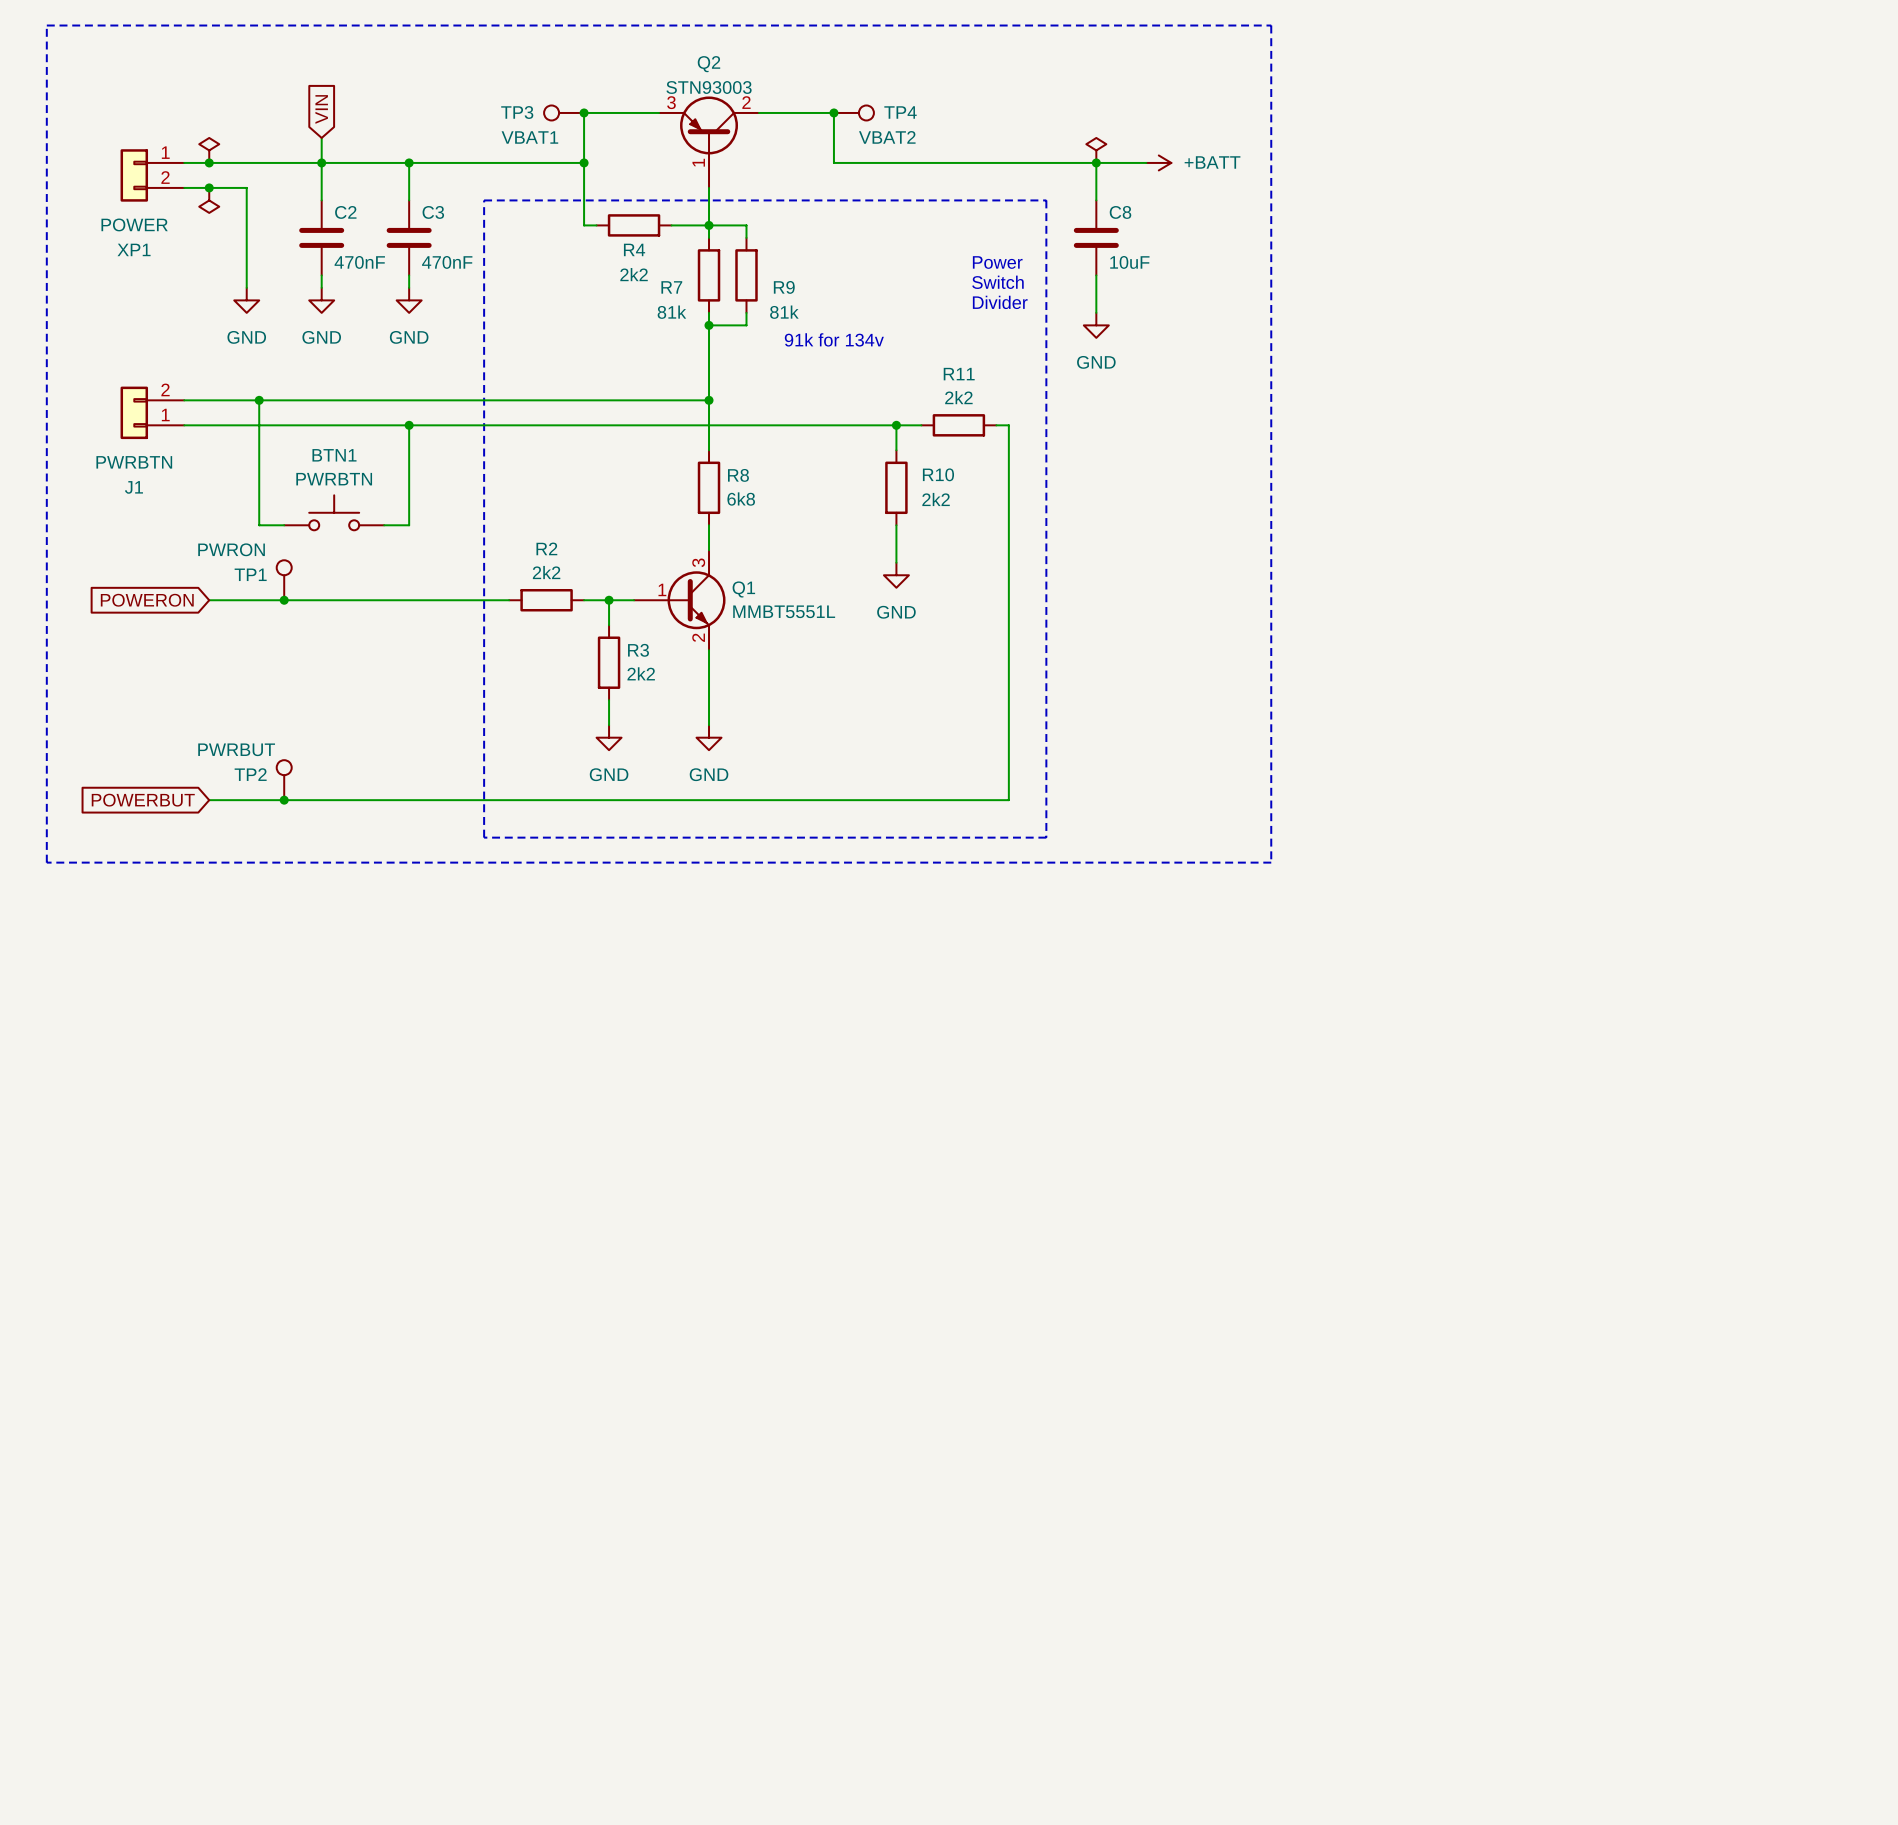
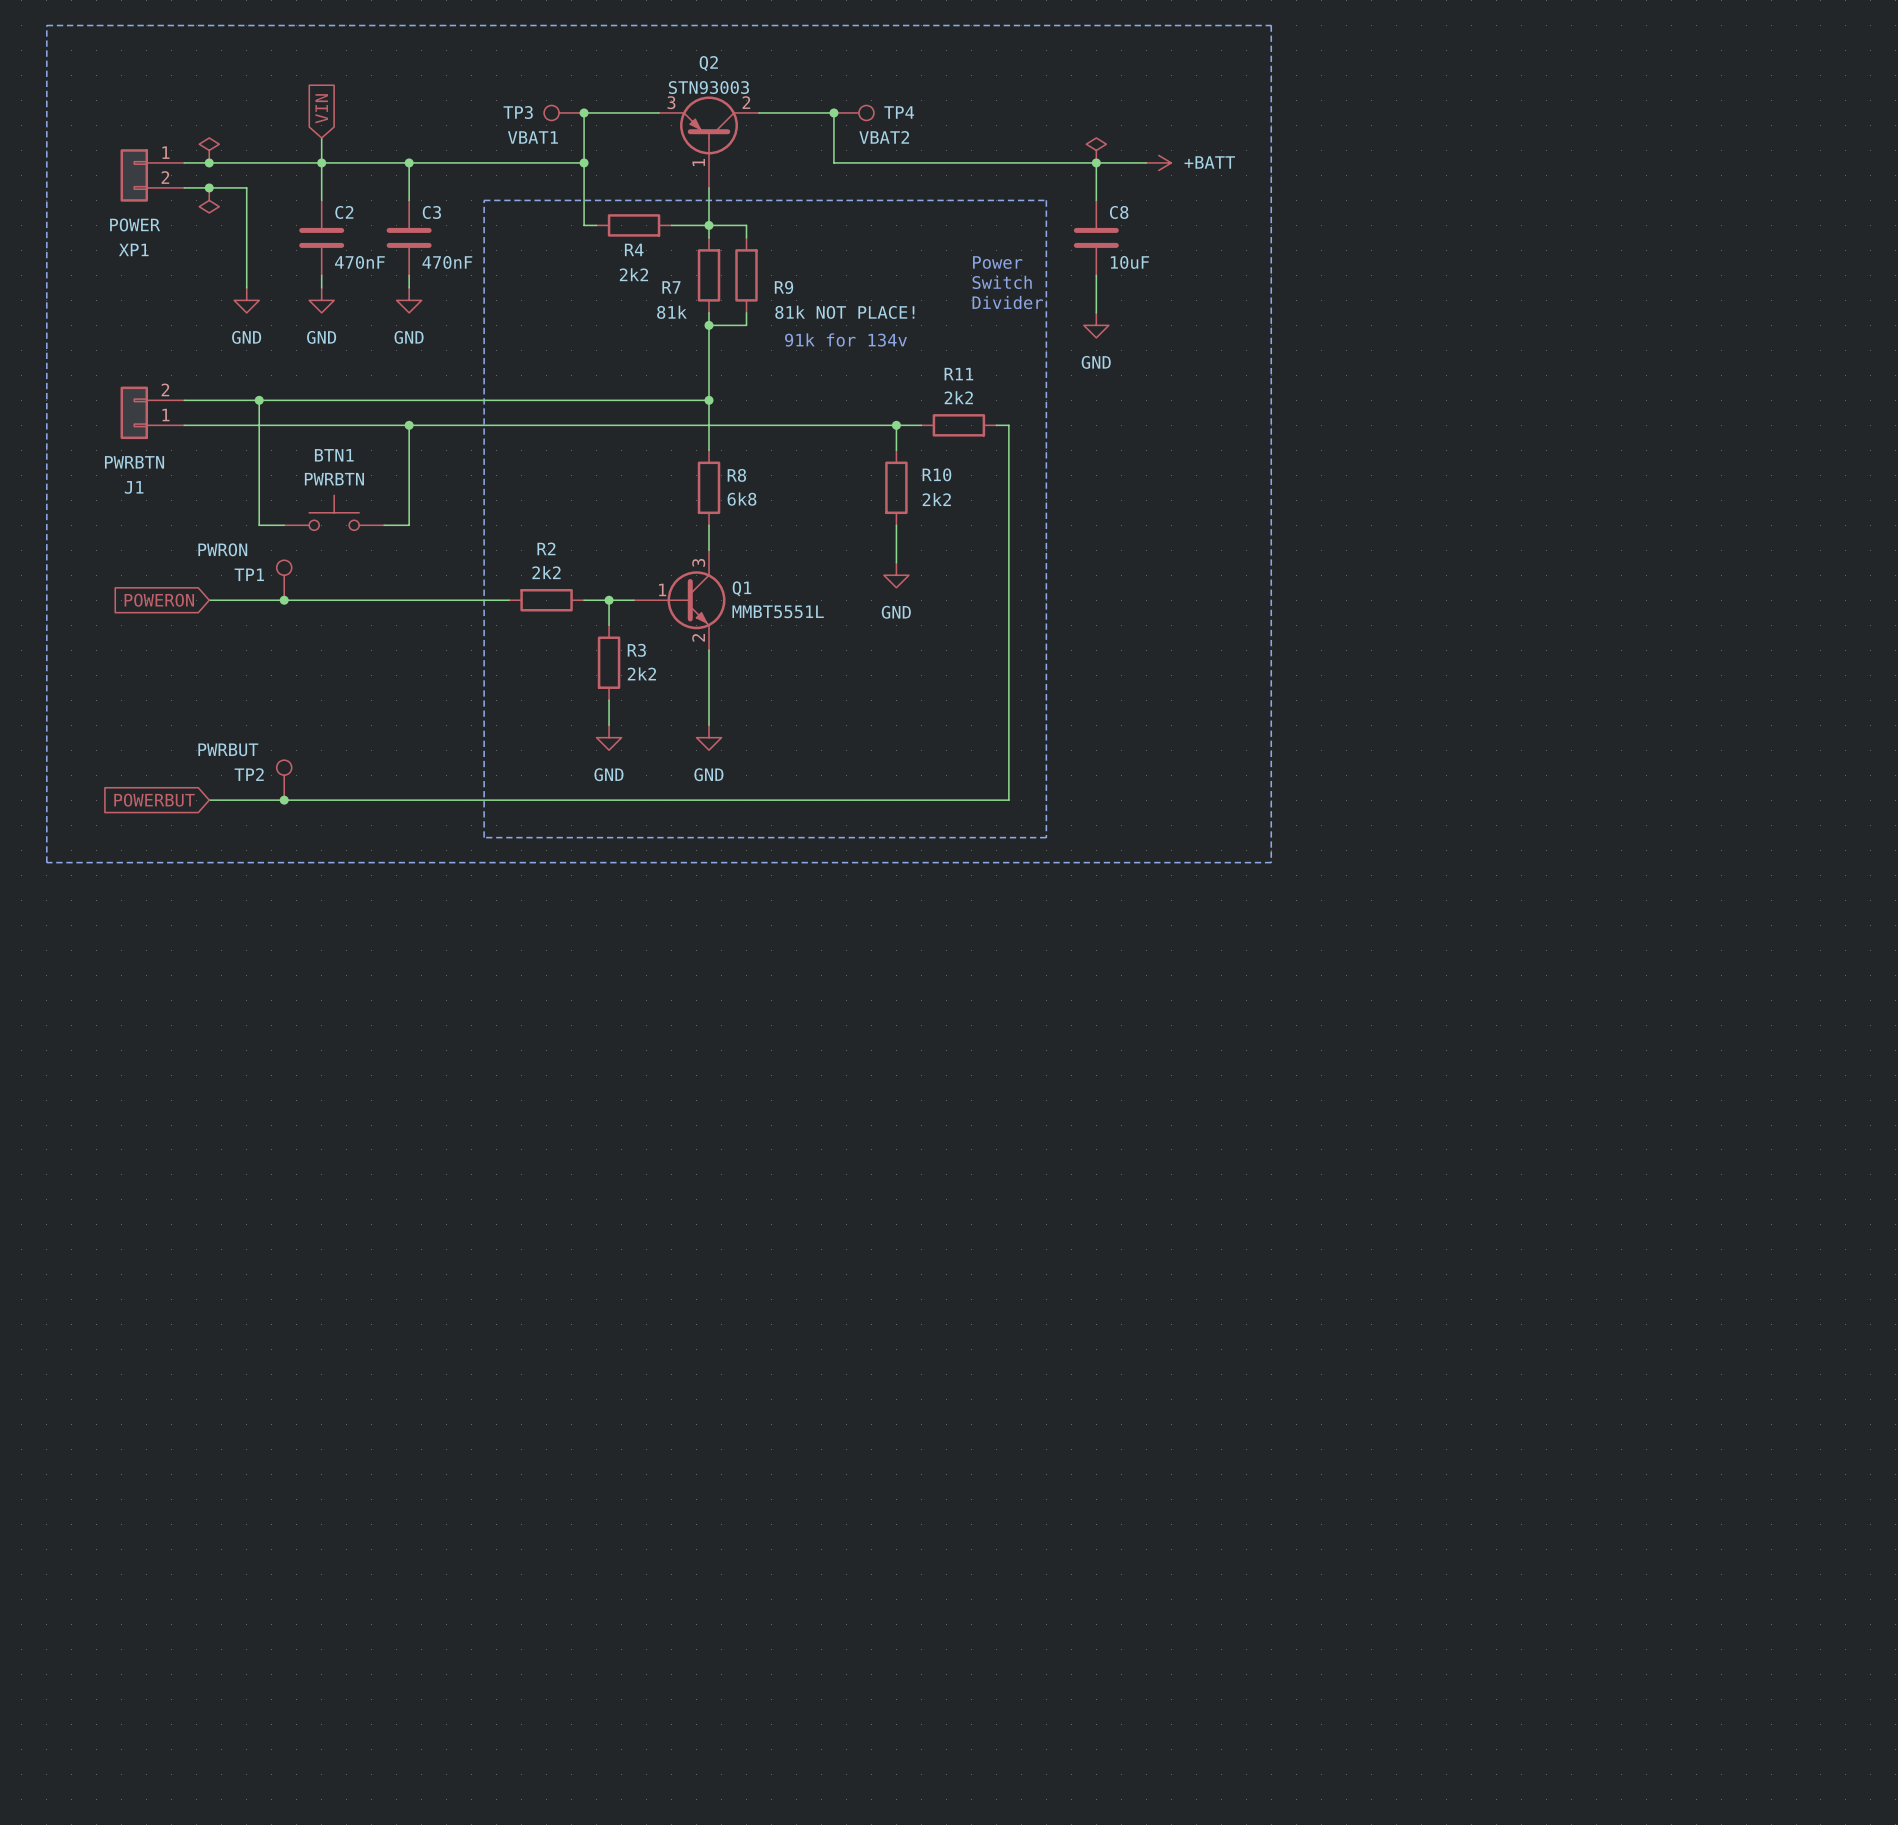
R9 value: 81k (784, 312) -> 81k NOT PLACE! (844, 312)

